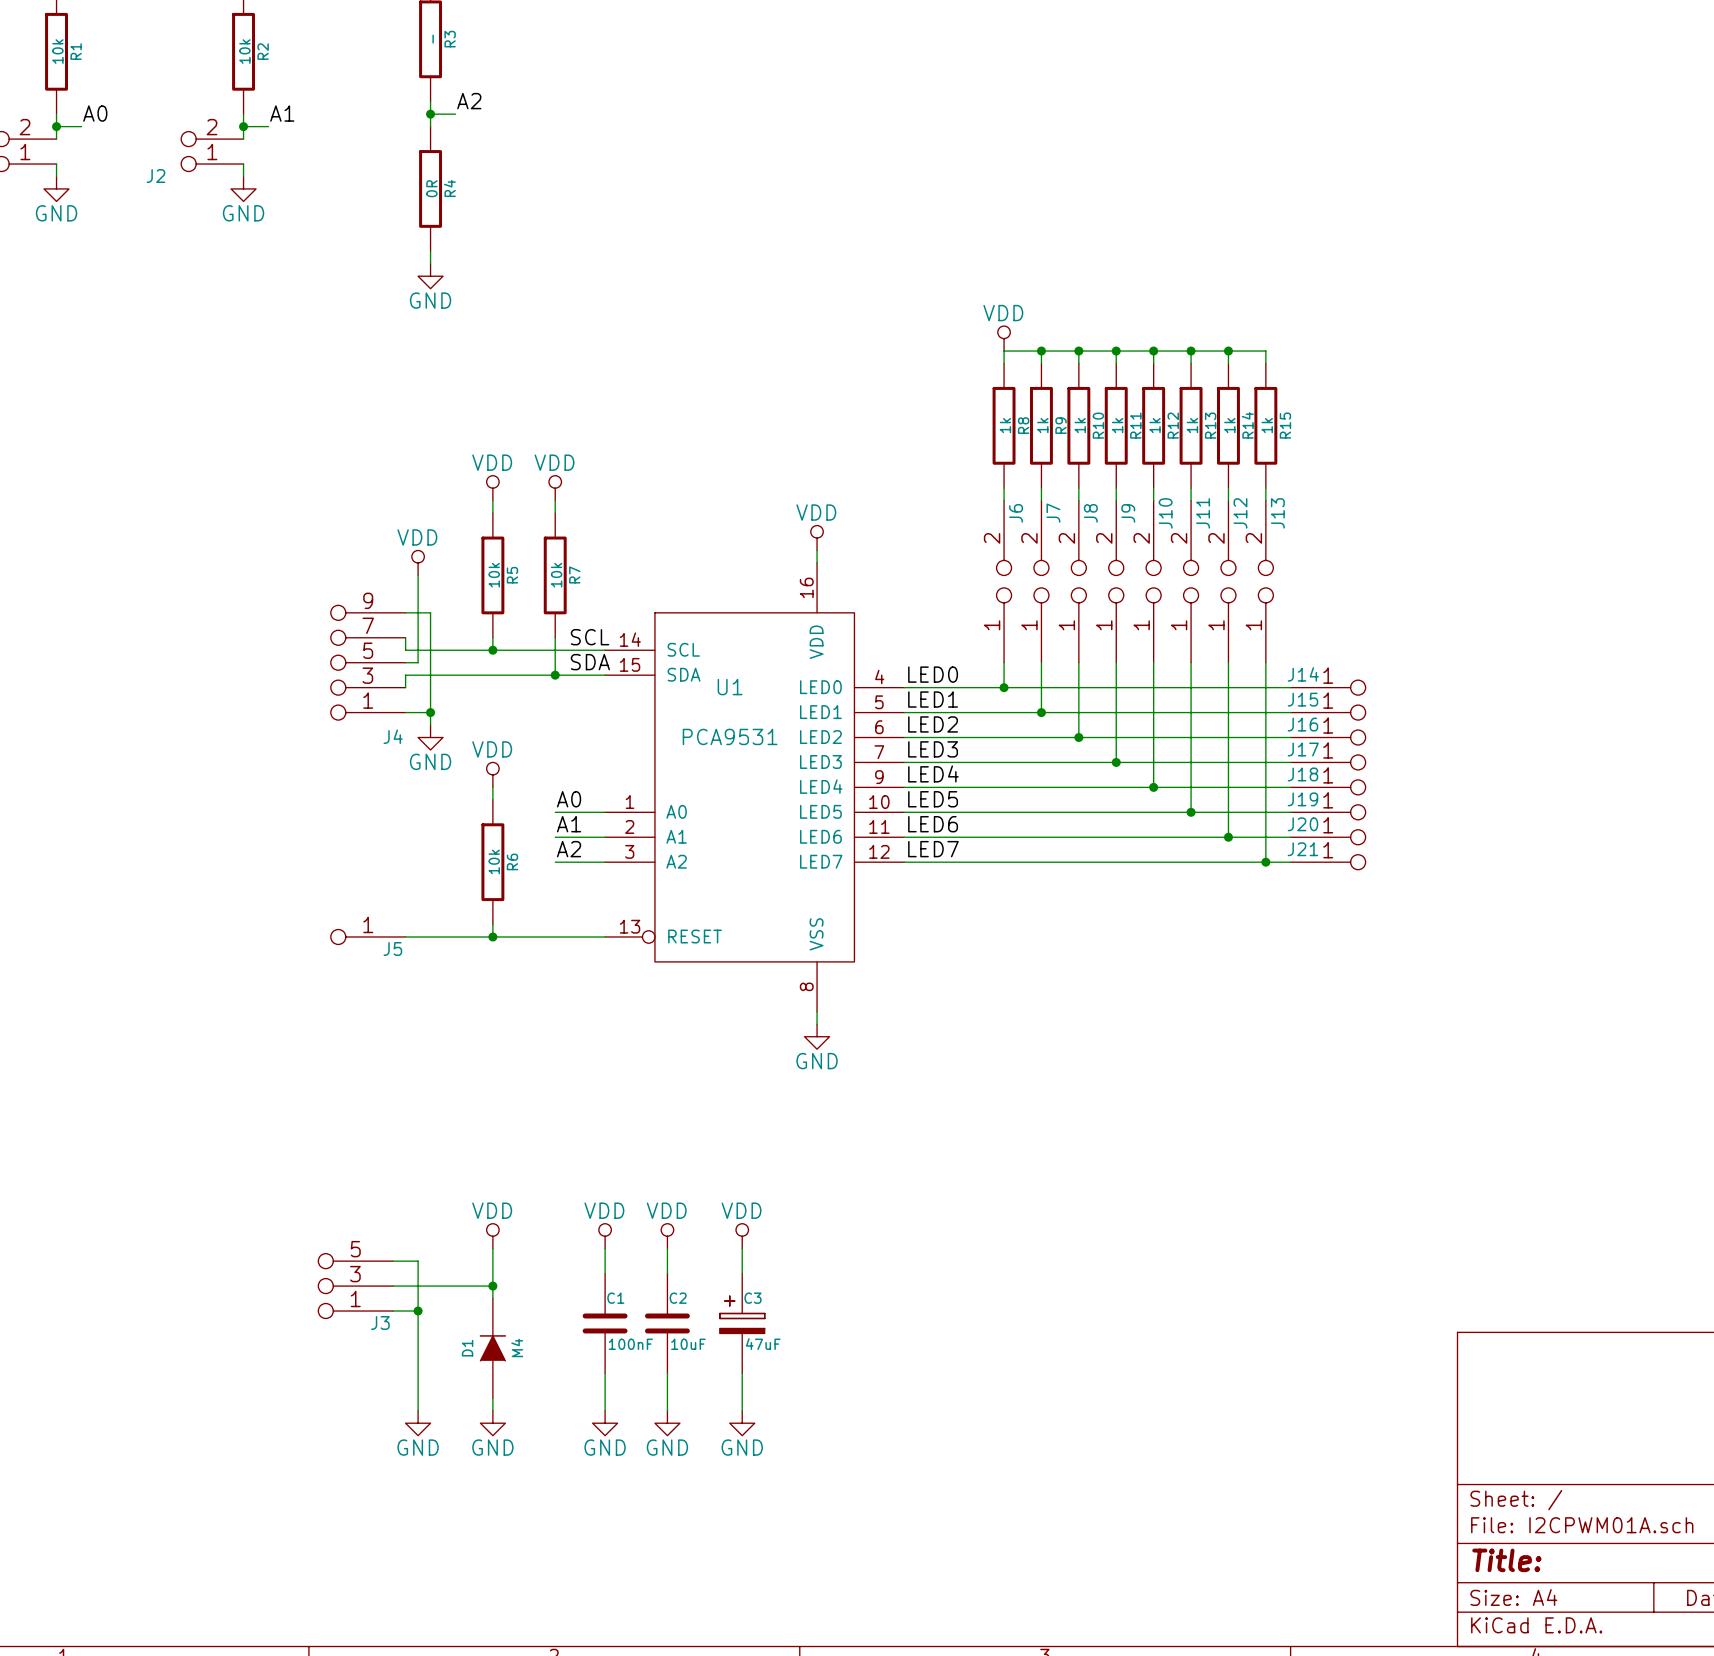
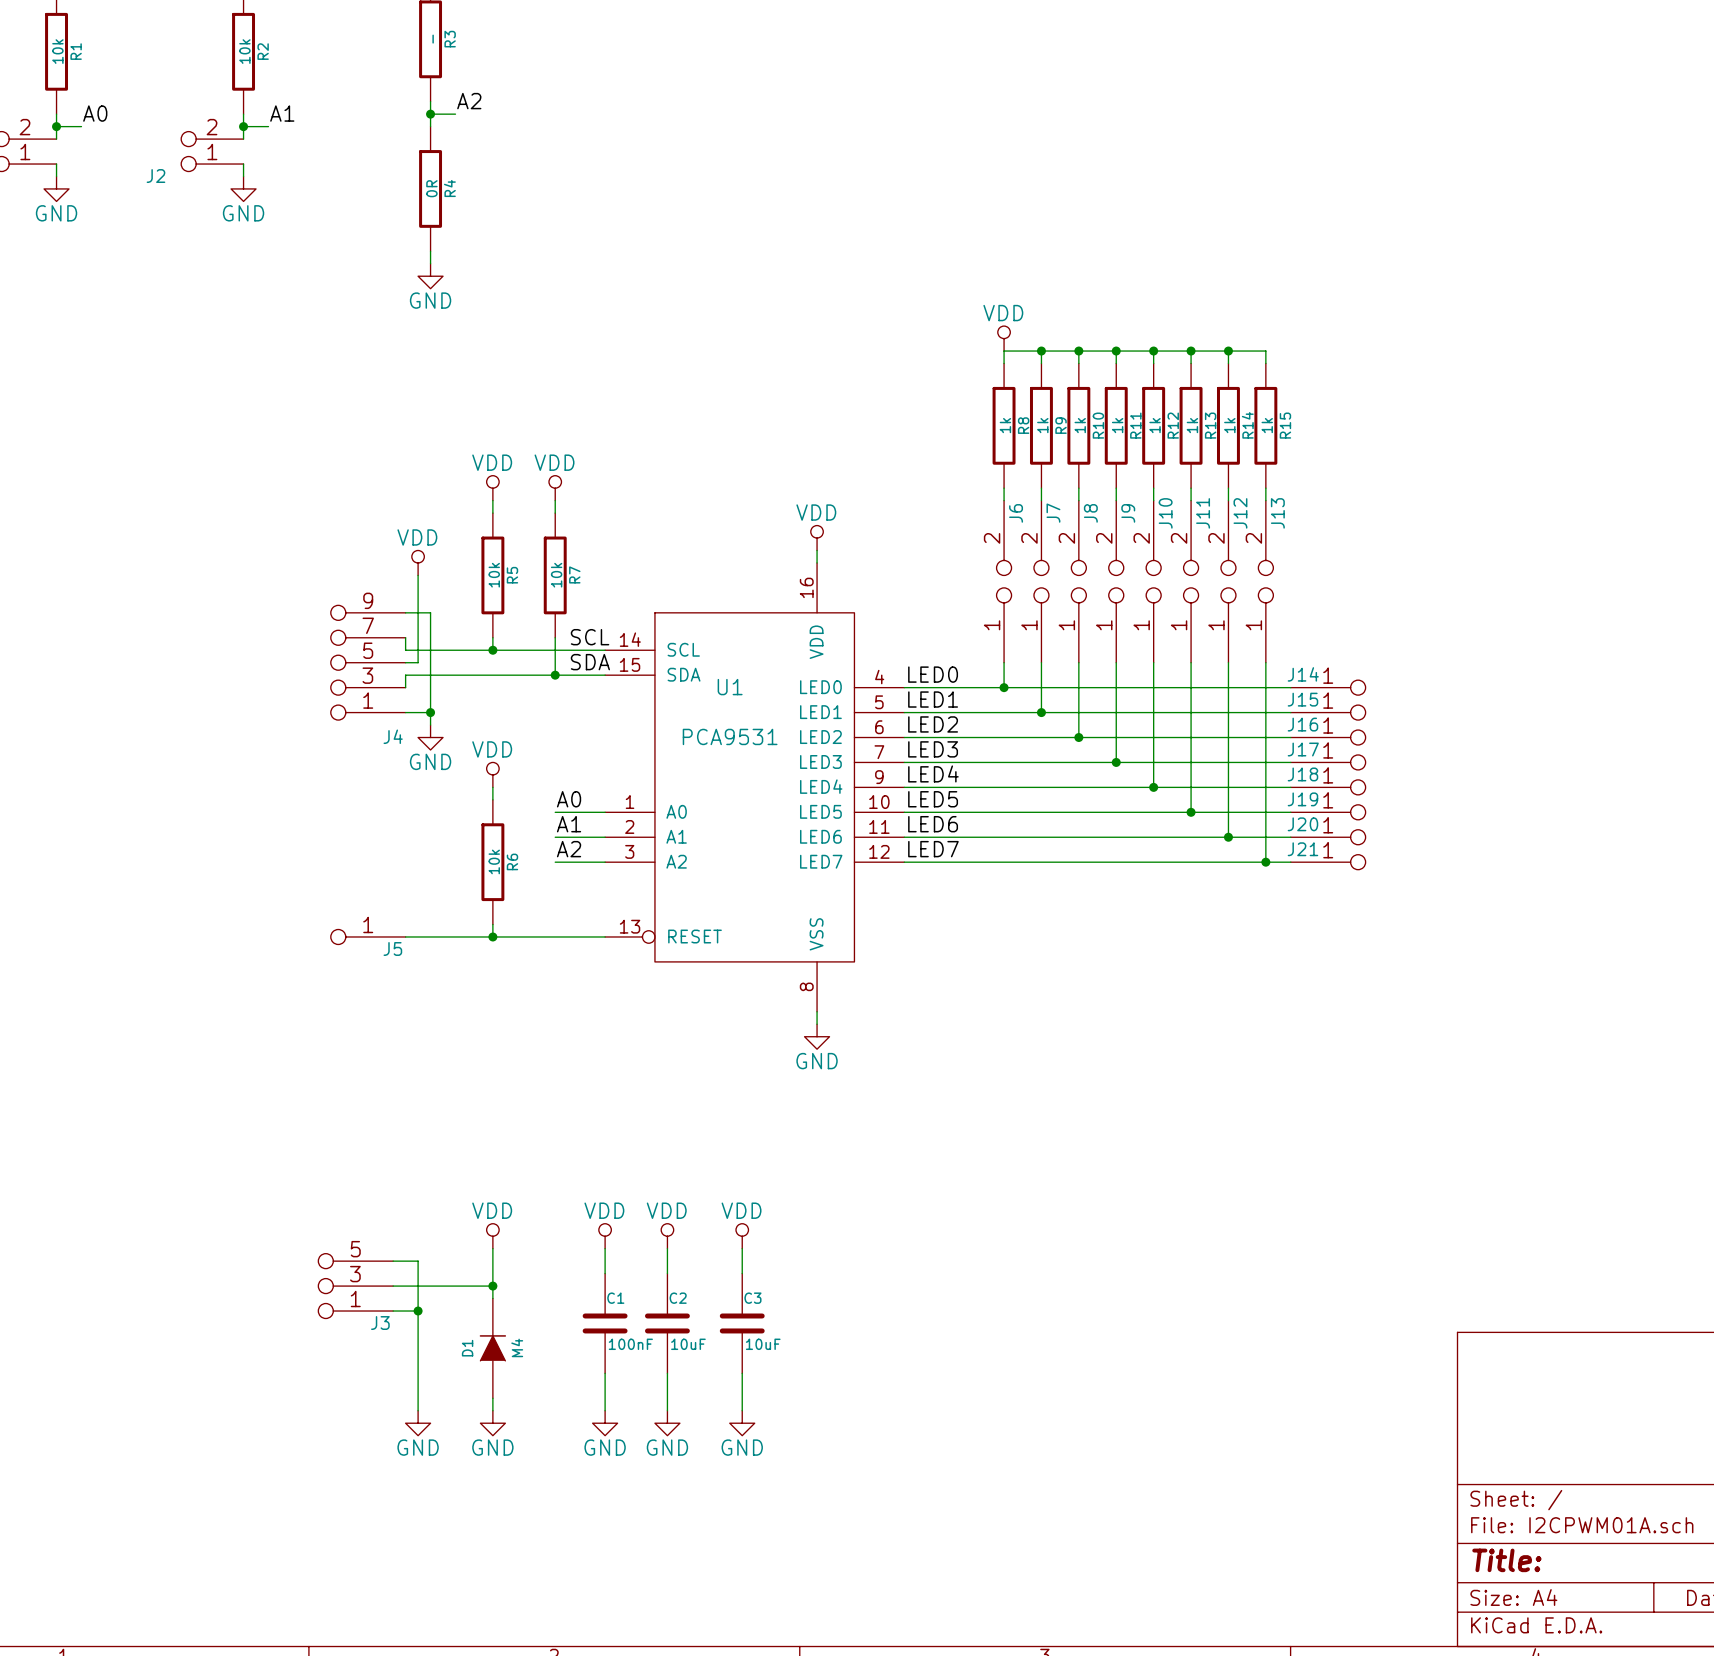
C3 symbol: [719, 1273, 765, 1374] -> [719, 1273, 765, 1374]
C3 value: 47uF (763, 1344) -> 10uF (763, 1344)

